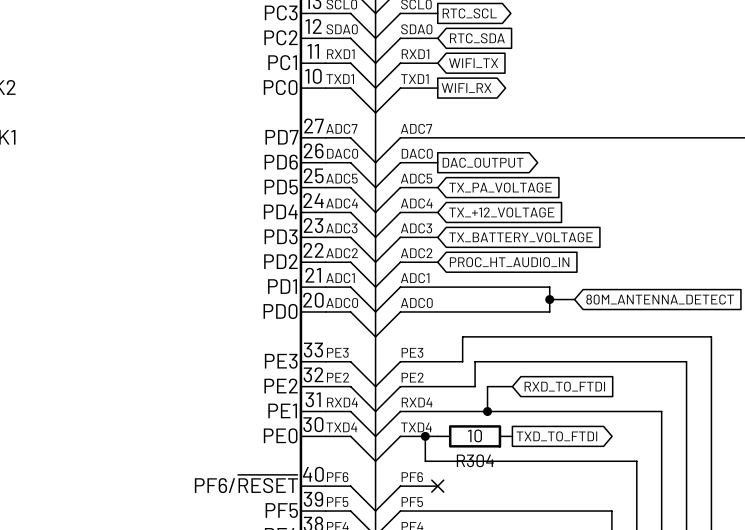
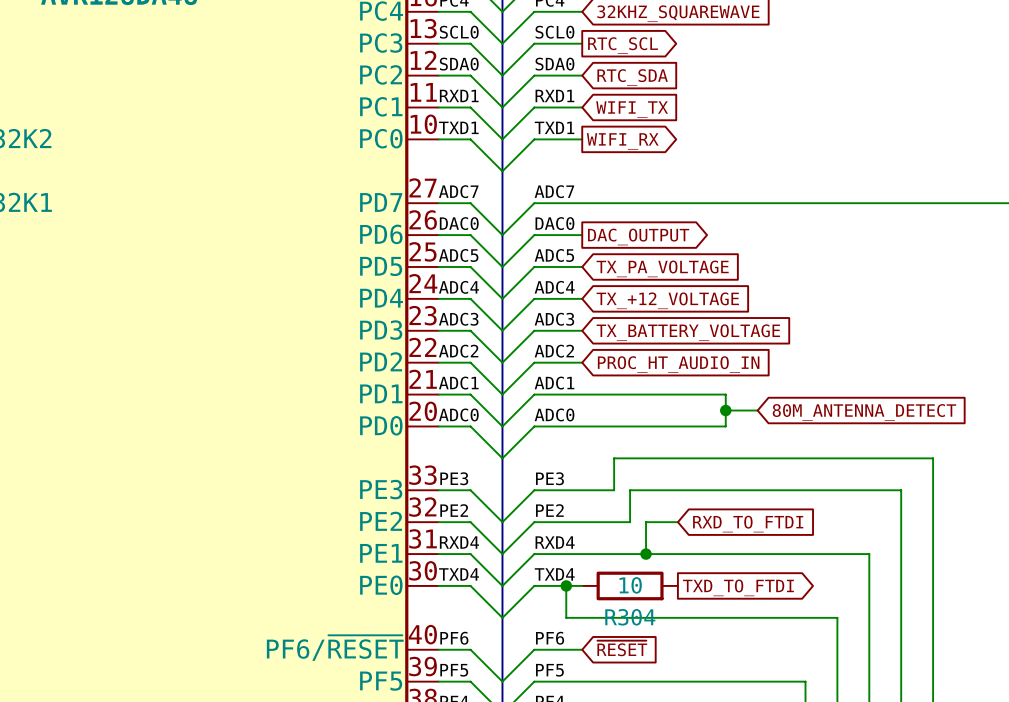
global label: none -> ~{RESET} (622, 648)
no-connect mark: (437, 486) -> none

